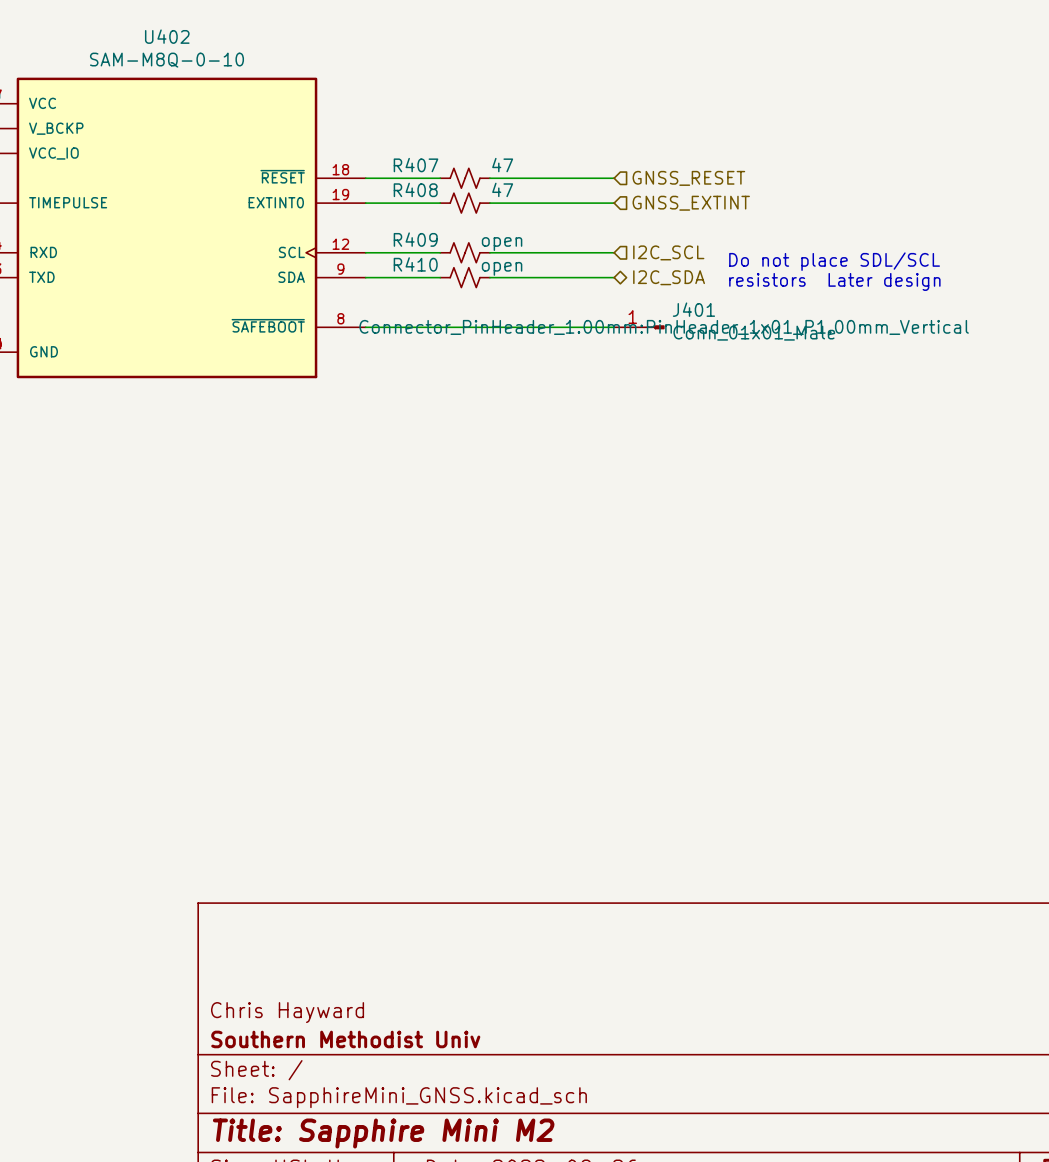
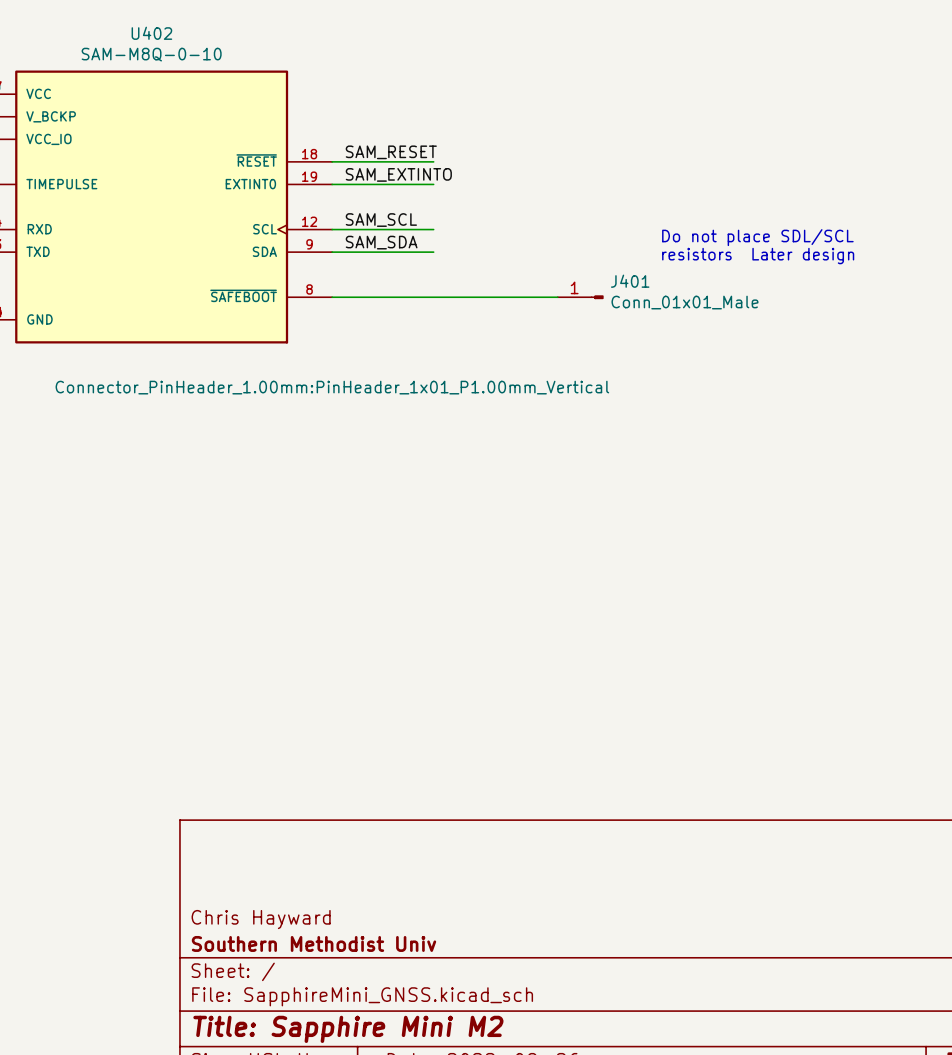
label: none -> SAM_RESET (391, 152)
wire: none -> (399, 161) (433, 161)
R407: 47 (465, 178) -> none
wire: (489, 178) (614, 178) -> none
hierarchical label: GNSS_RESET (688, 178) -> none
label: none -> SAM_EXTINTO (398, 174)
wire: none -> (399, 184) (433, 184)
R408: 47 (465, 203) -> none
wire: (489, 203) (614, 203) -> none
hierarchical label: GNSS_EXTINT (691, 203) -> none
label: none -> SAM_SCL (381, 220)
wire: none -> (399, 229) (433, 229)
R409: open (465, 252) -> none
wire: (489, 252) (614, 252) -> none
hierarchical label: I2C_SCL (668, 252) -> none
label: none -> SAM_SDA (381, 242)
wire: none -> (399, 252) (433, 252)
R410: open (465, 277) -> none
wire: (489, 277) (614, 277) -> none
hierarchical label: I2C_SDA (669, 277) -> none
J401 text position: Connector_PinHeader_1.00mm:PinHeader_1x01_P1.00mm_Vertical (664, 327) -> Connector_PinHeader_1.00mm:PinHeader_1x01_P1.00mm_Vertical (332, 387)

